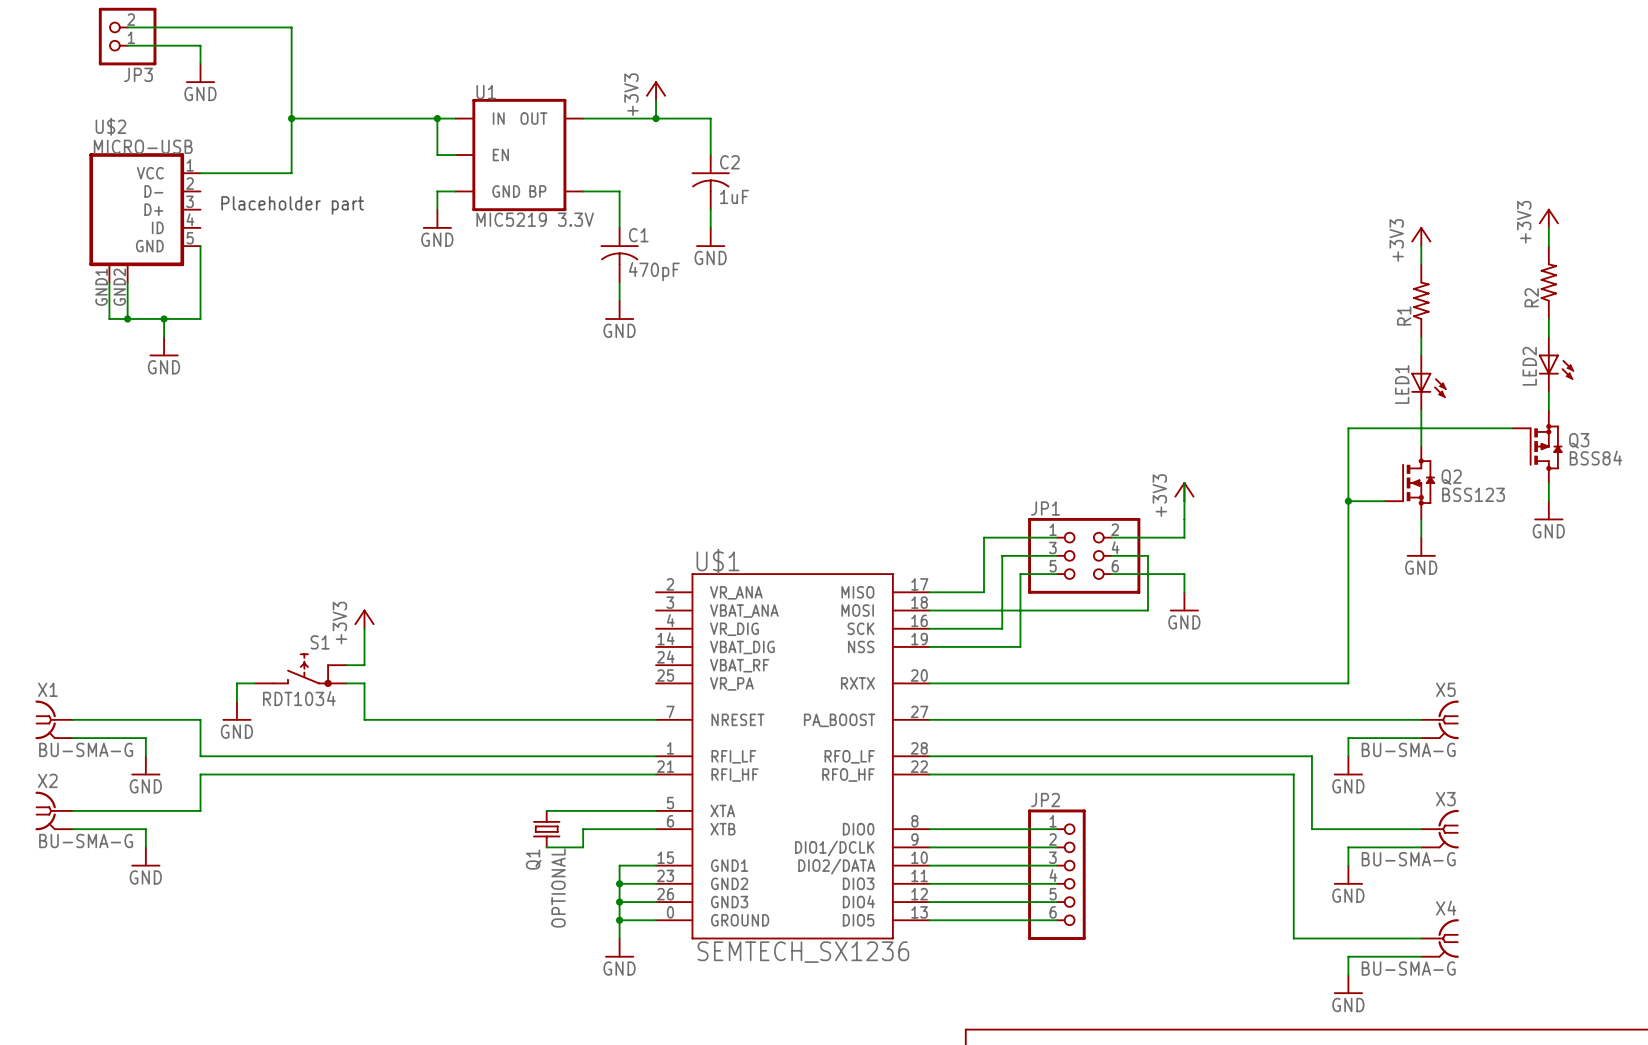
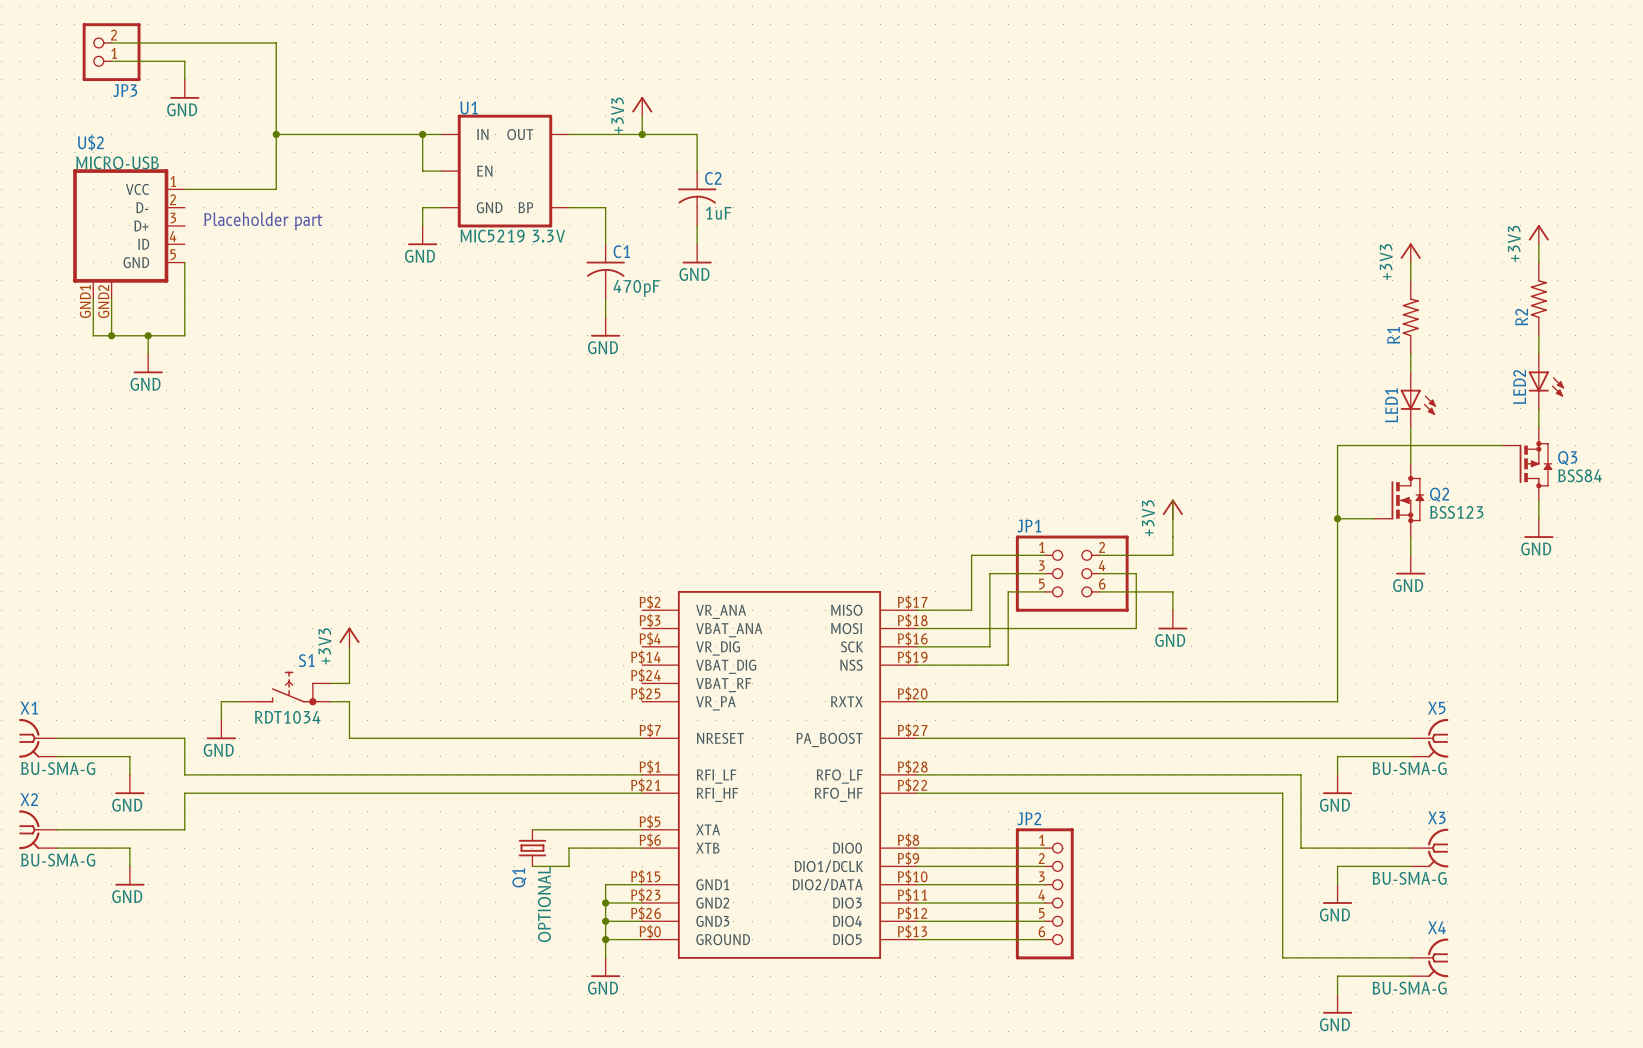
U$1 name: U$1 (718, 561) -> none
U$1 symbol: [656, 573, 930, 940] -> [642, 591, 917, 959]
U$1 value: SEMTECH_SX1236 (803, 952) -> none

